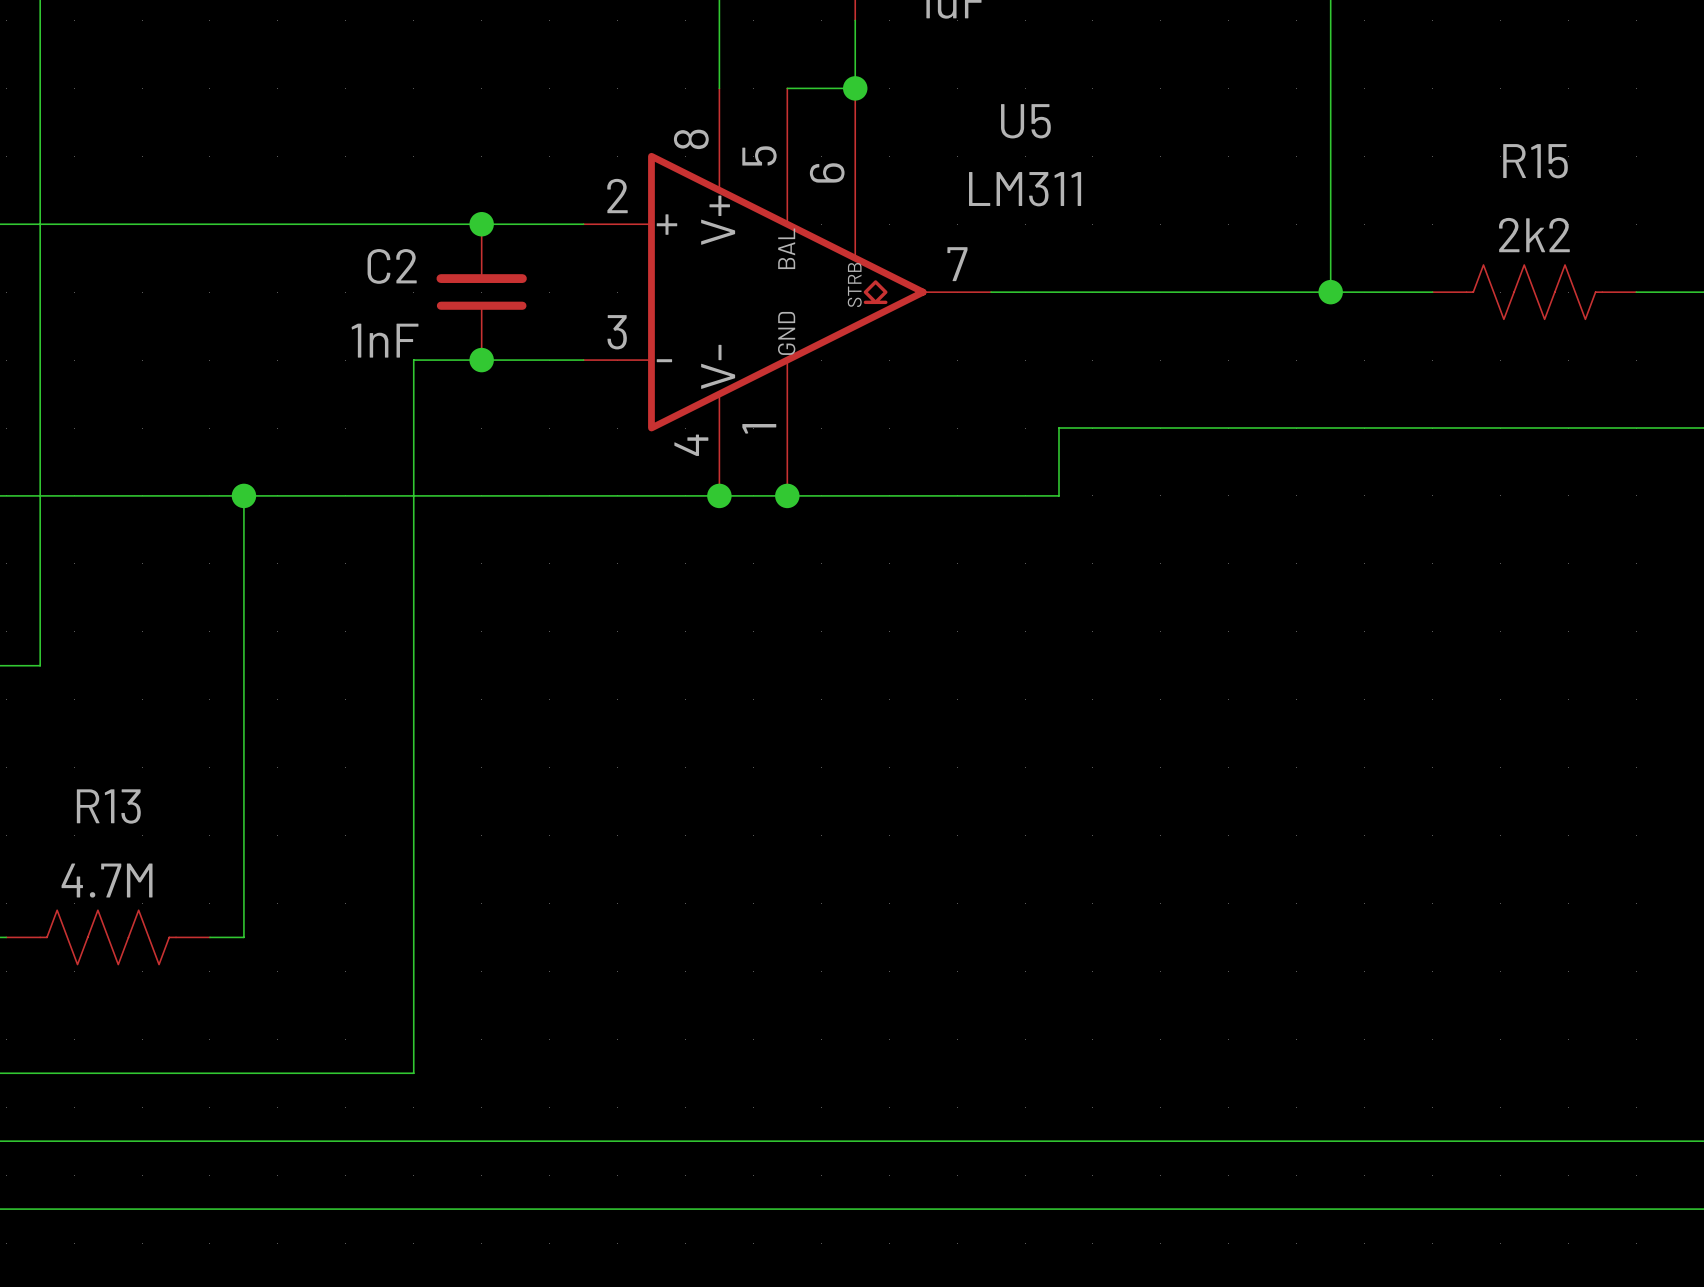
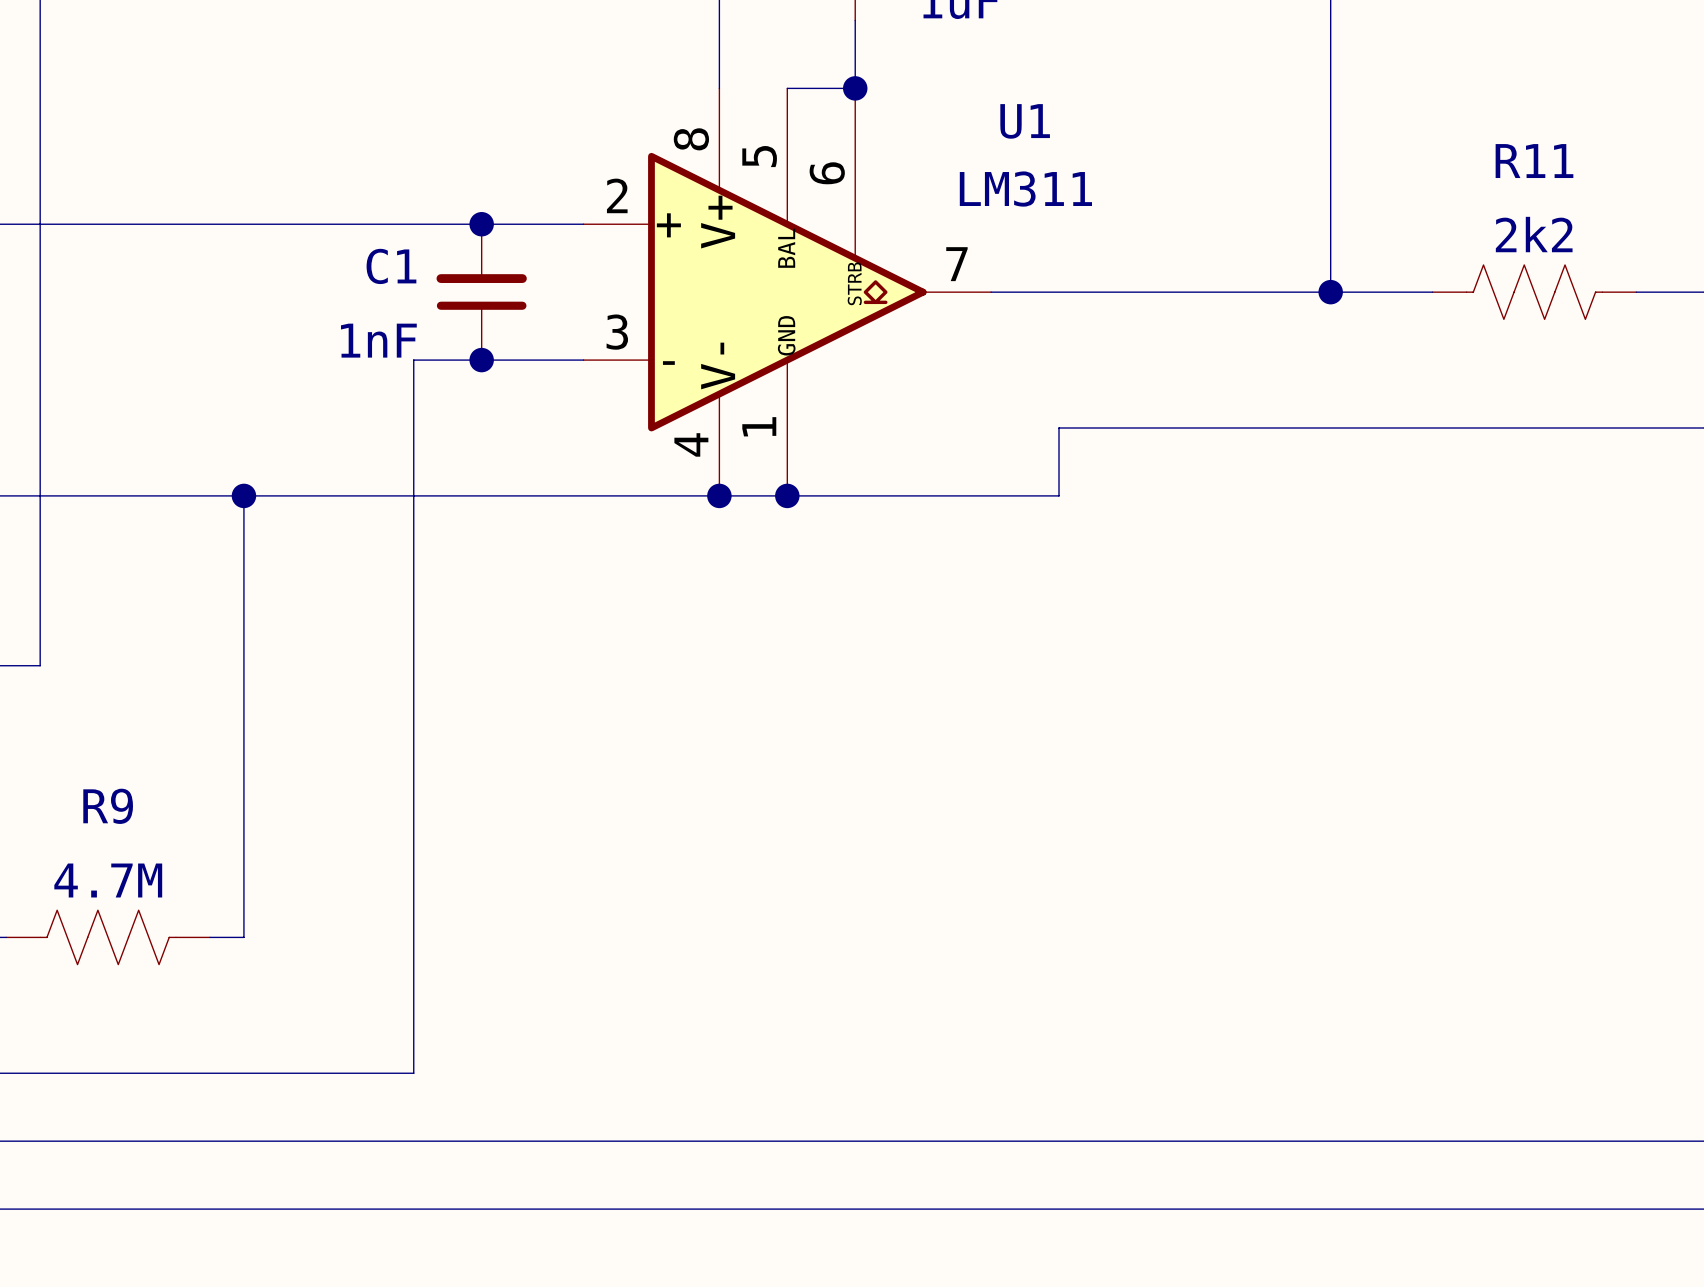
U5 name: U5 (1025, 121) -> U1 (1025, 121)
R15 name: R15 (1535, 161) -> R11 (1534, 161)
C2 name: C2 (392, 266) -> C1 (391, 266)
R13 name: R13 (108, 806) -> R9 (108, 806)

